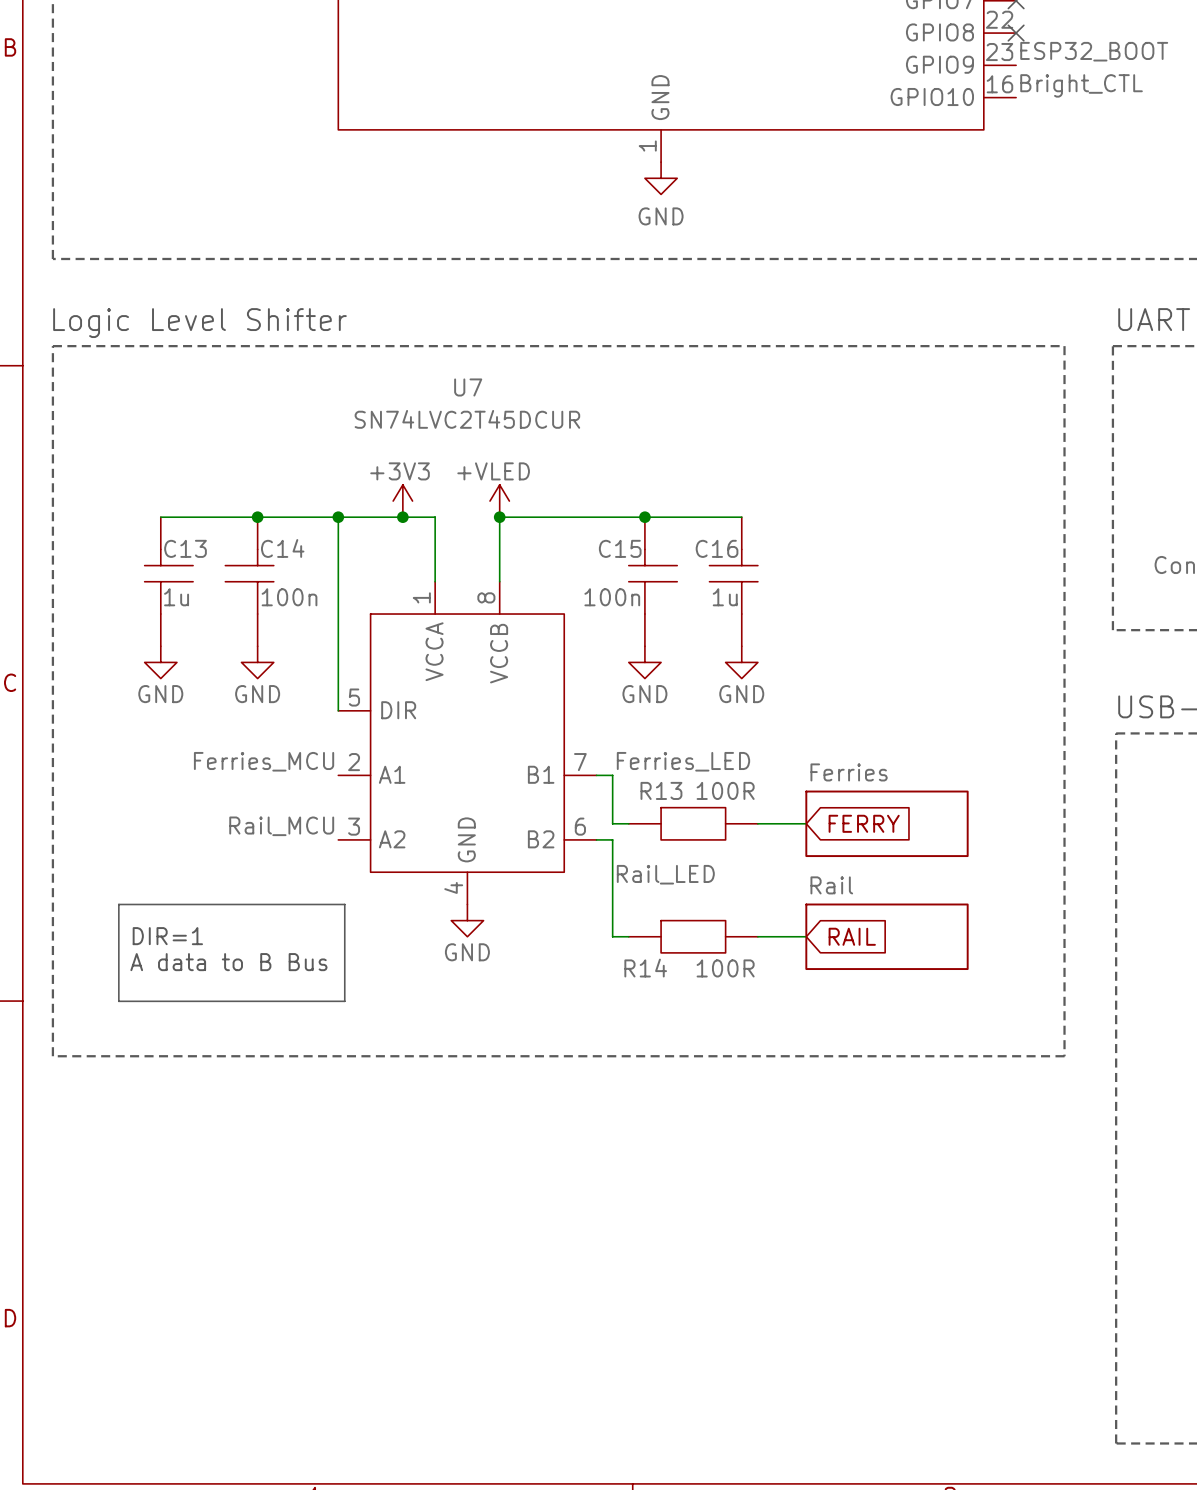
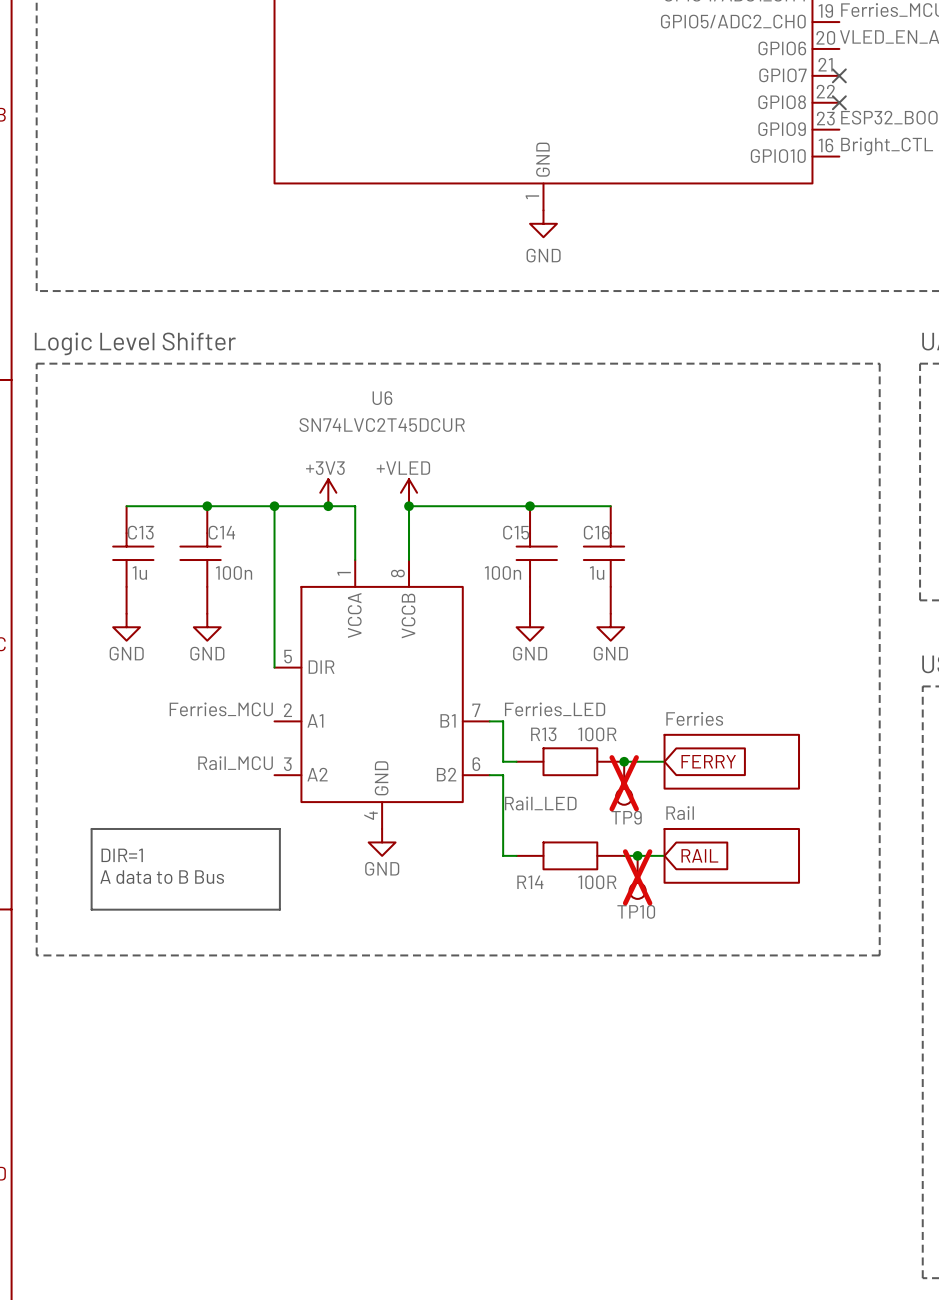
U7 name: U7 (468, 387) -> U6 (382, 398)
junction: none -> (624, 761)
TP9: none -> (624, 783)
junction: none -> (637, 855)
TP10: none -> (637, 877)

